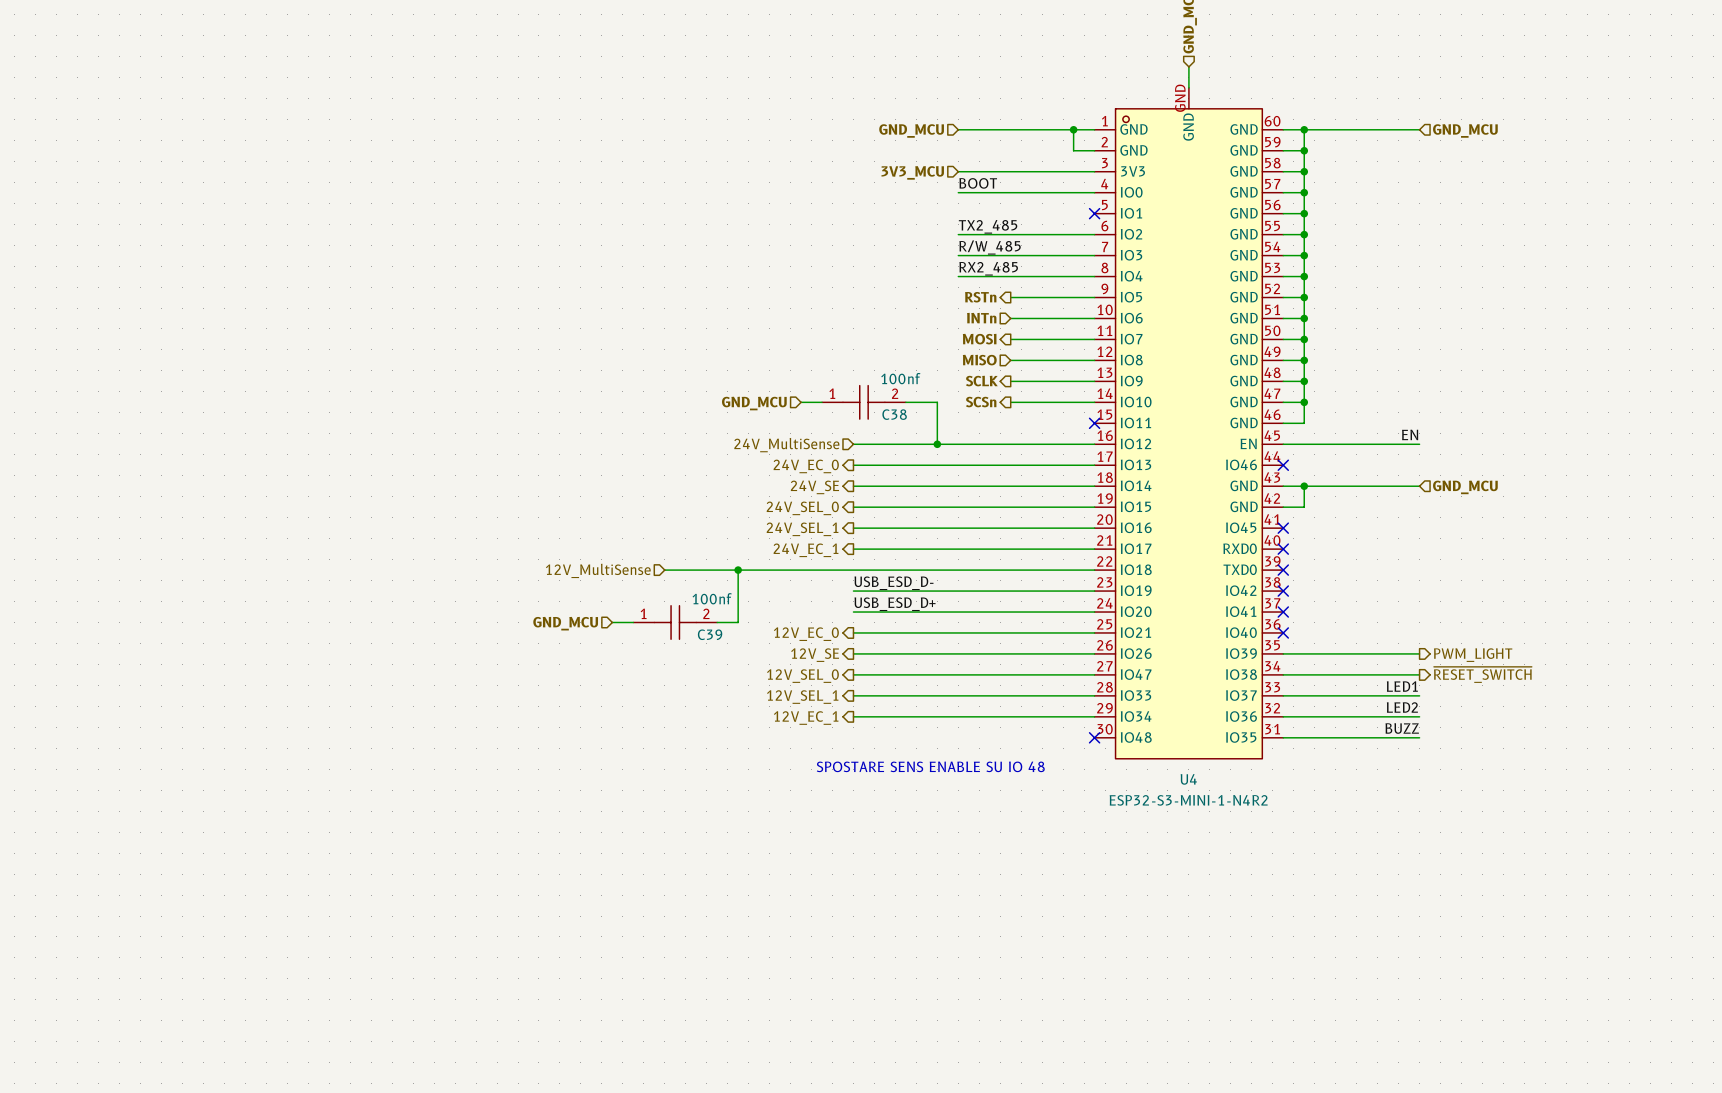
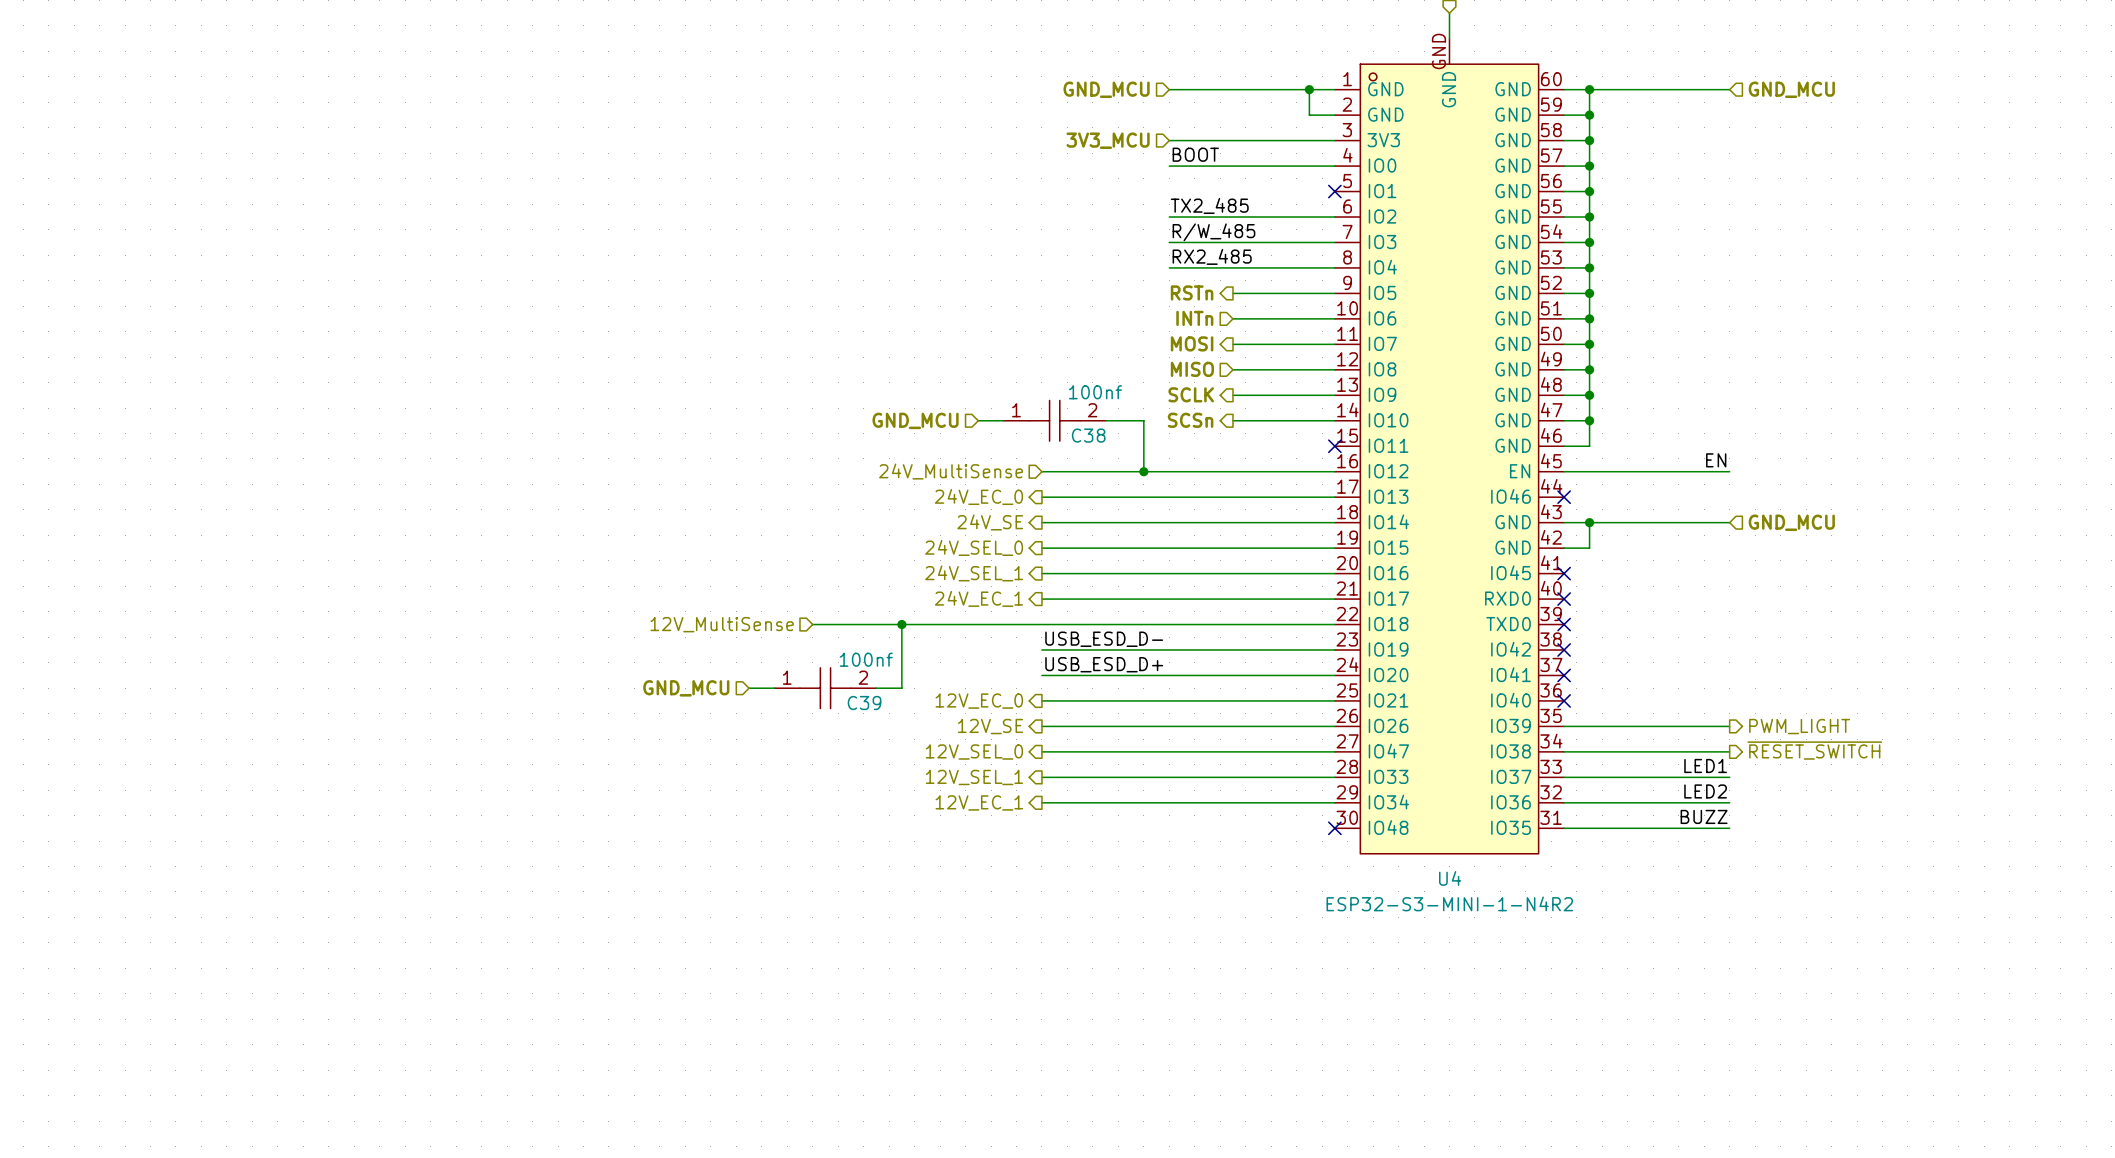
text: SPOSTARE SENS ENABLE SU IO 48 (930, 766) -> none

